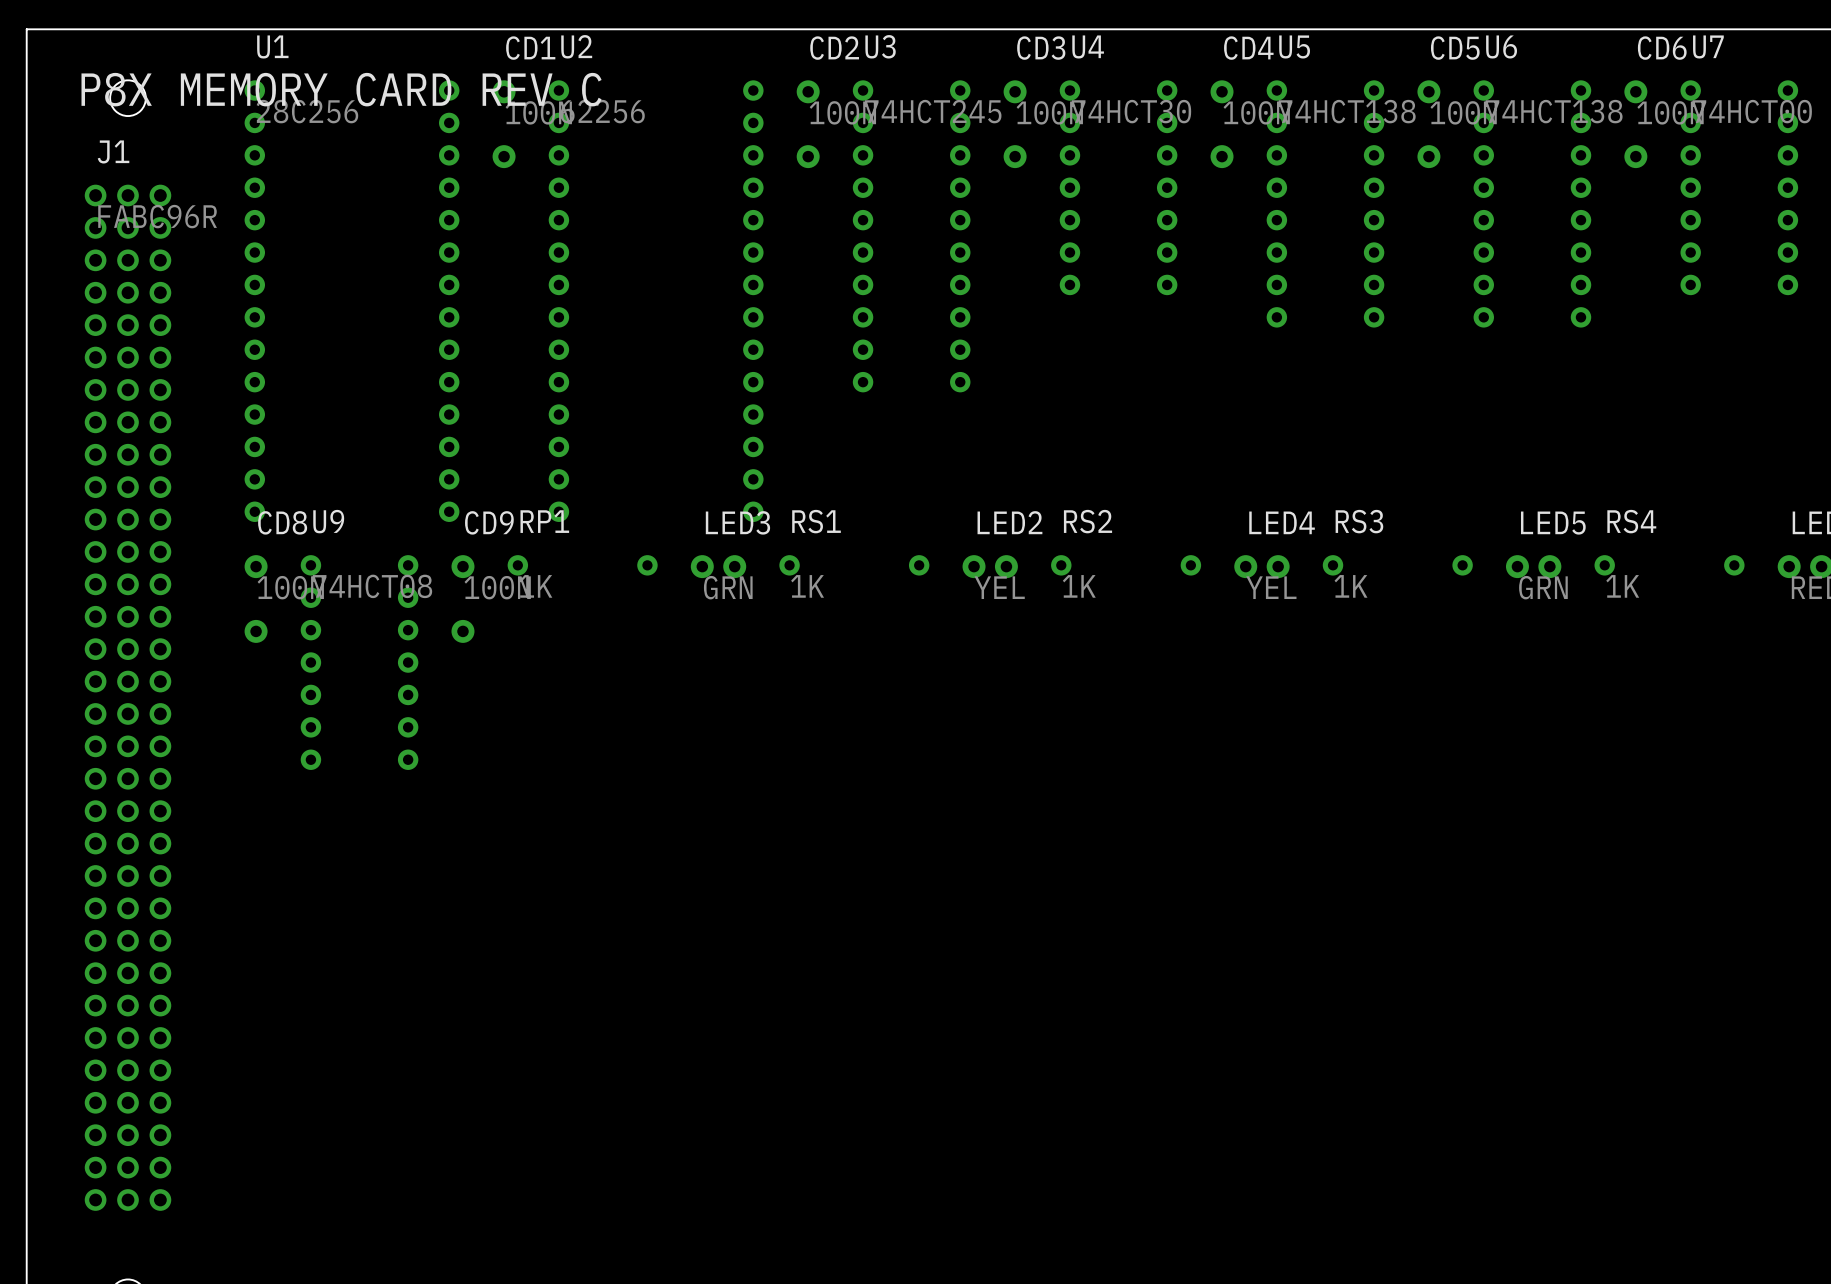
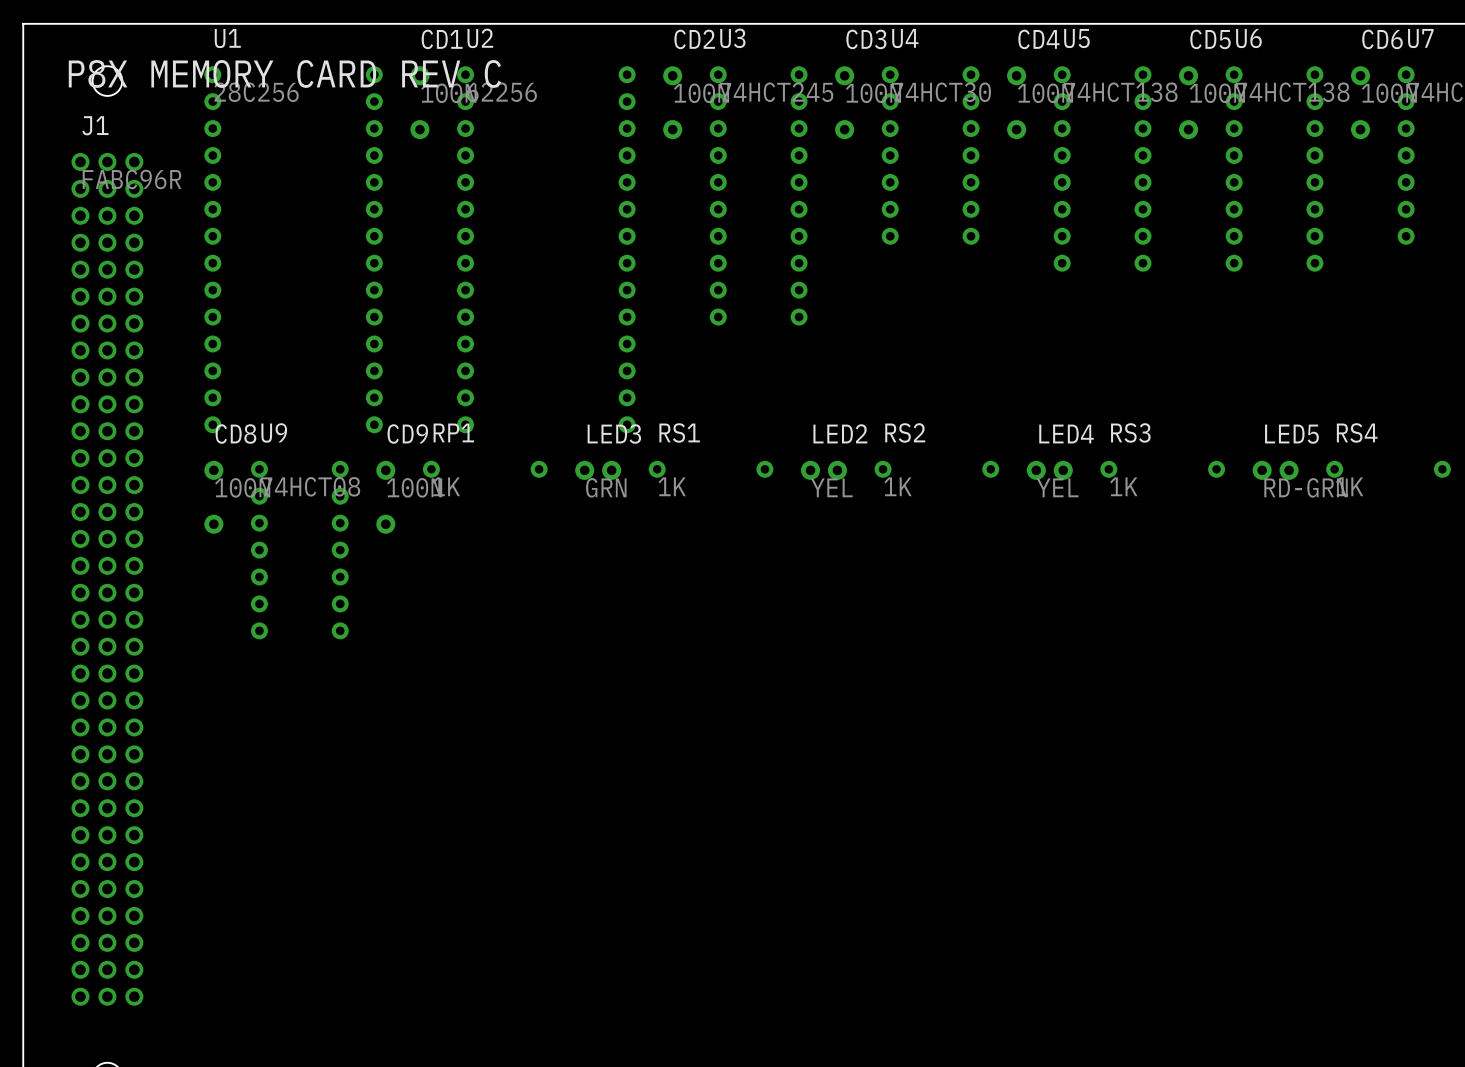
LED5 value: GRN (1543, 587) -> RD-GRN (1306, 487)

